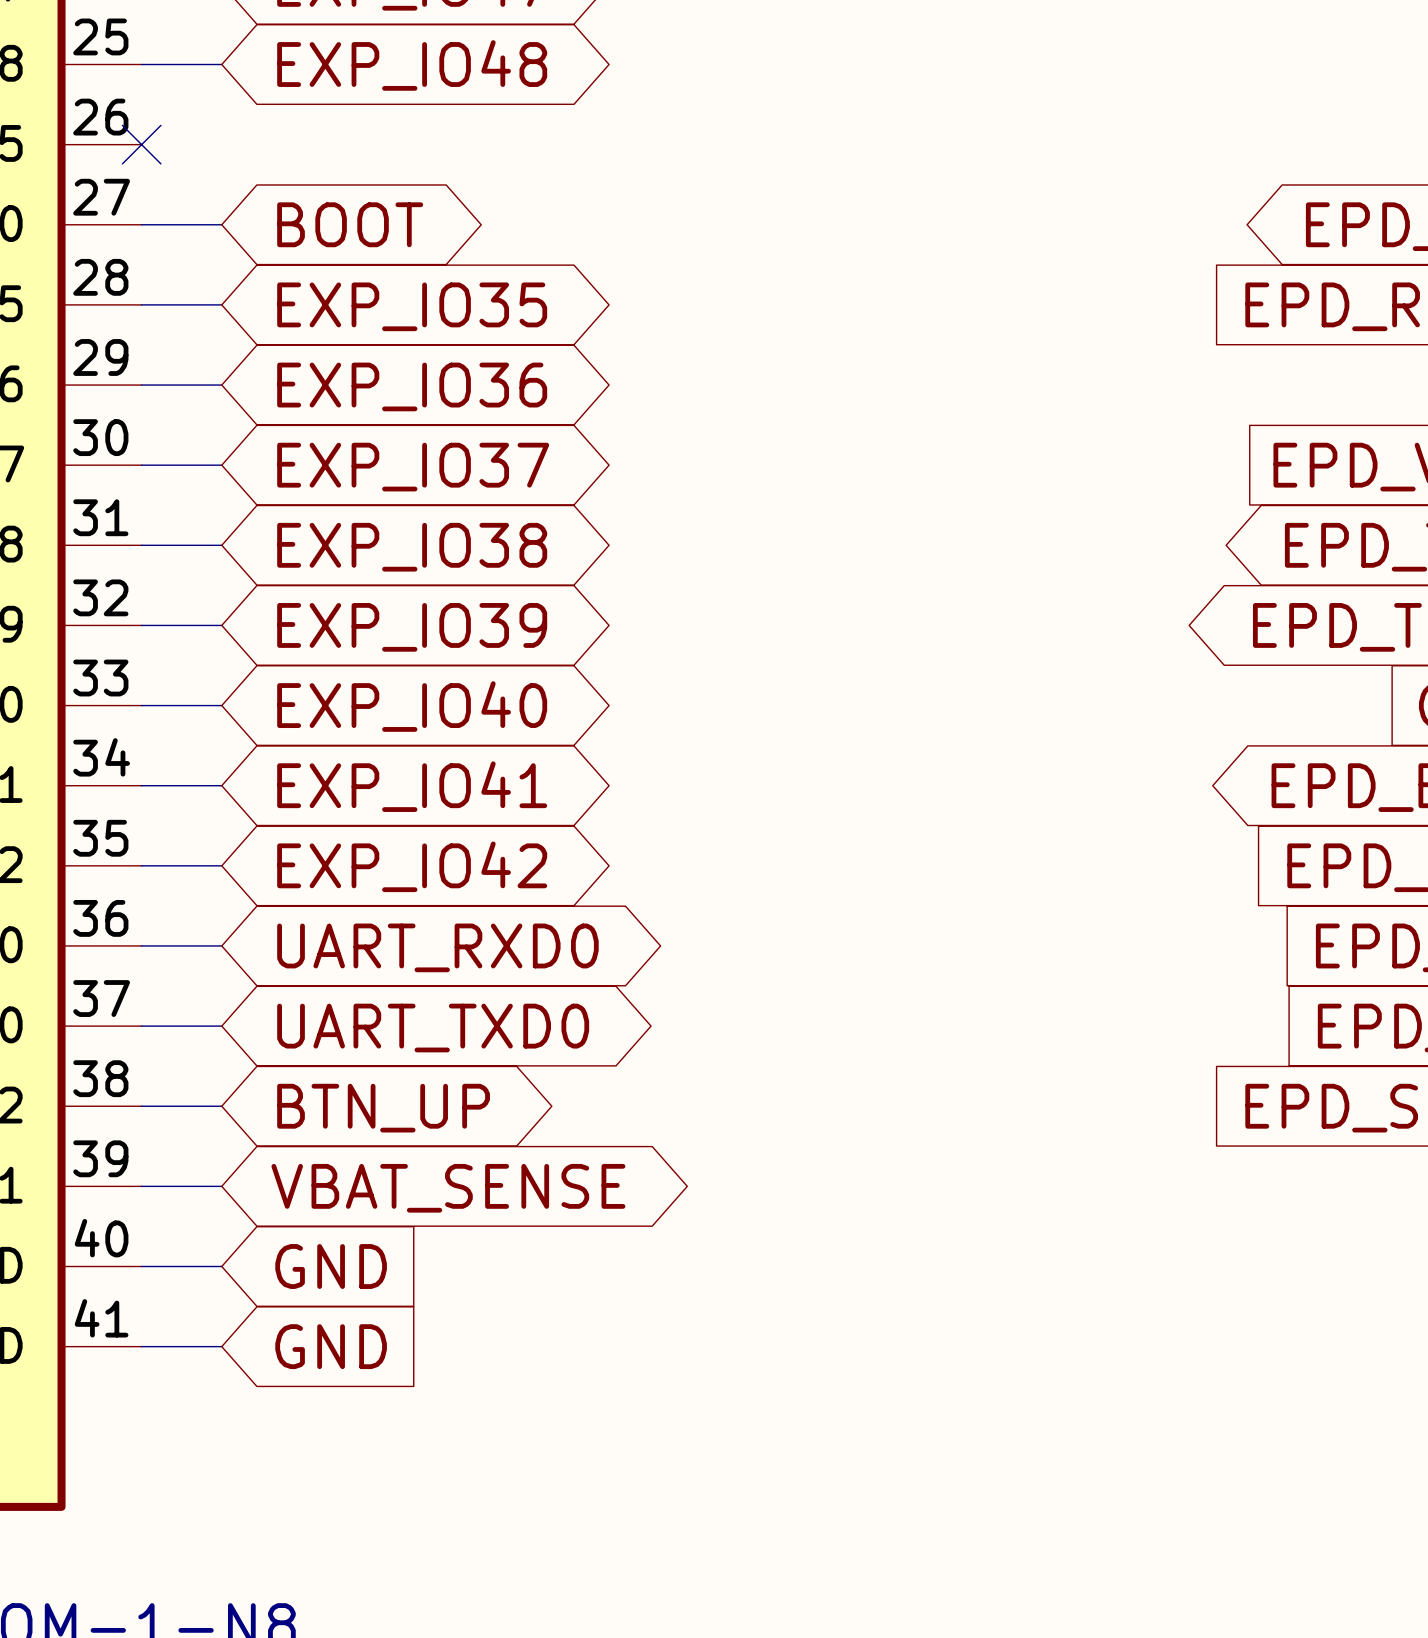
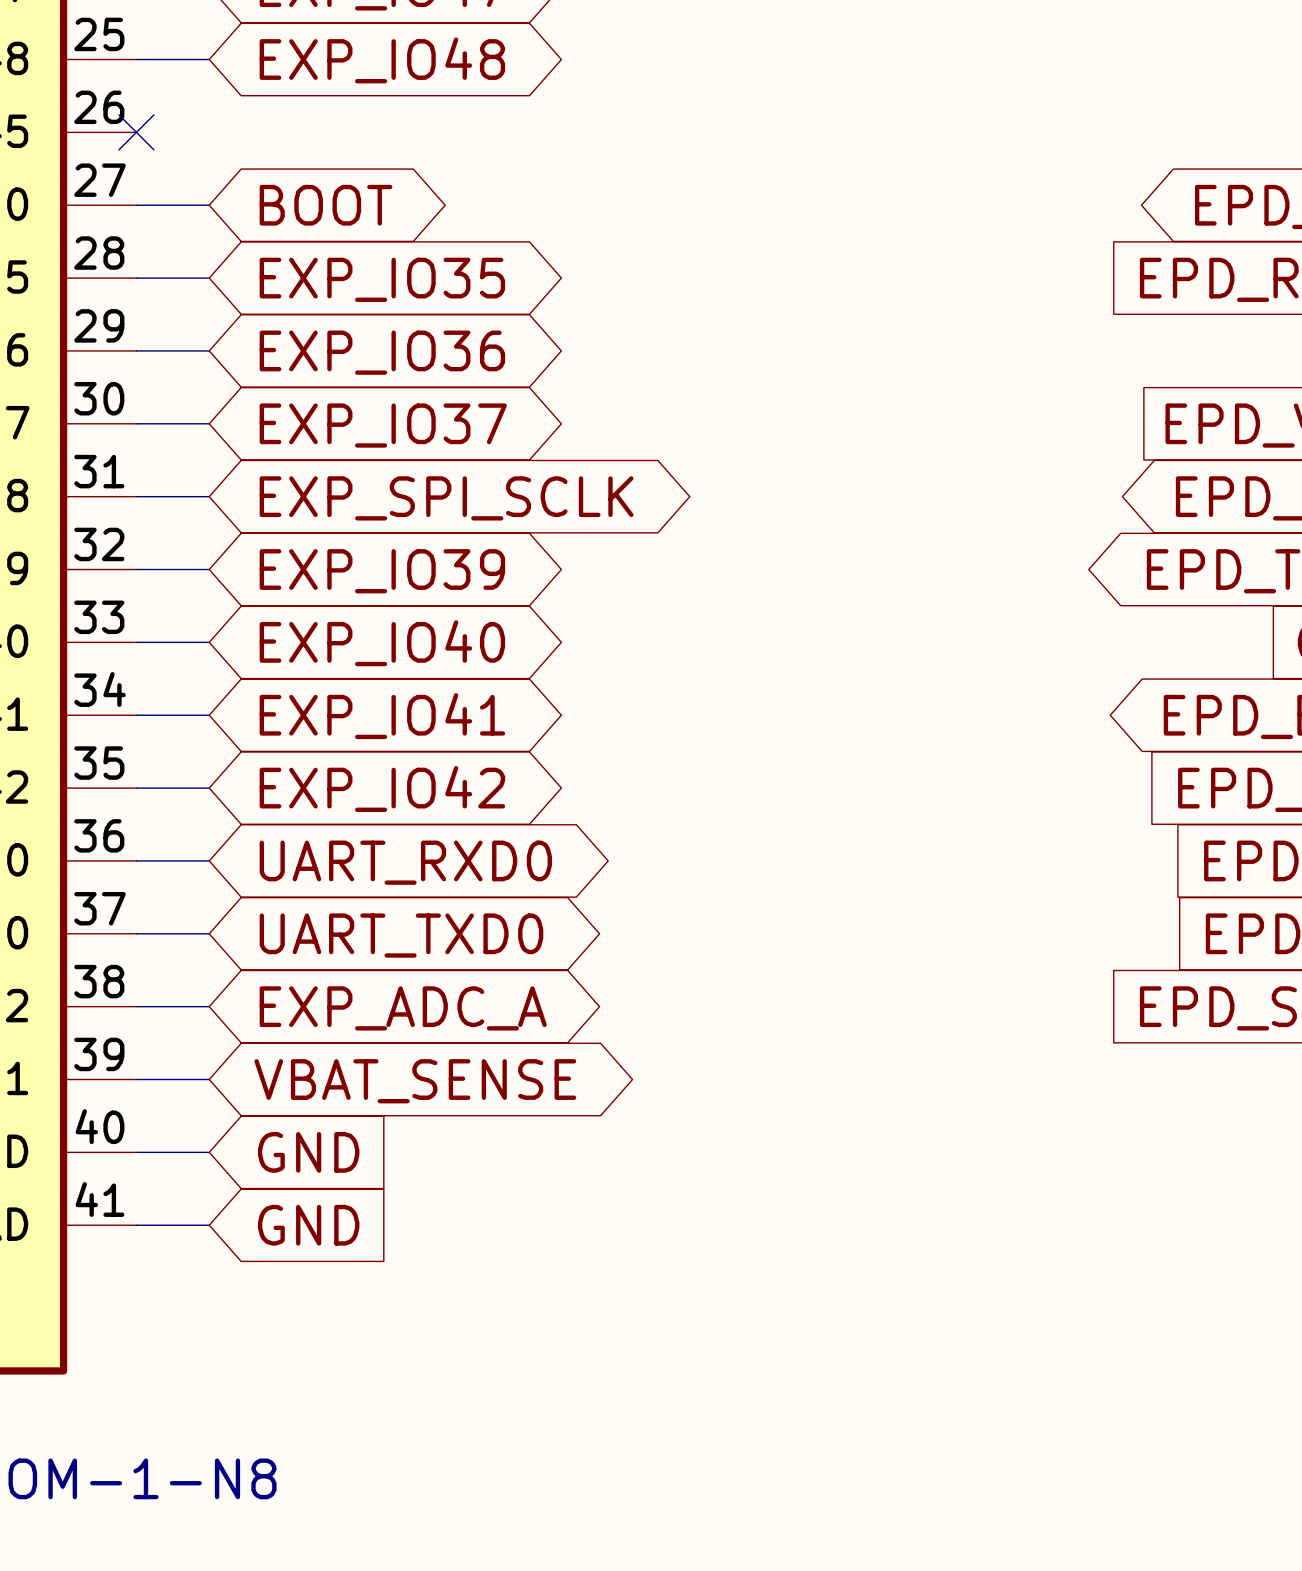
global label: EXP_IO38 (412, 547) -> EXP_SPI_SCLK (446, 498)
global label: BTN_UP (383, 1108) -> EXP_ADC_A (403, 1008)

